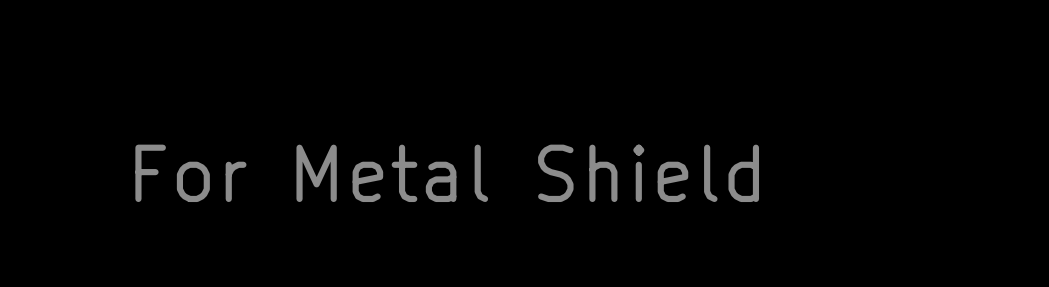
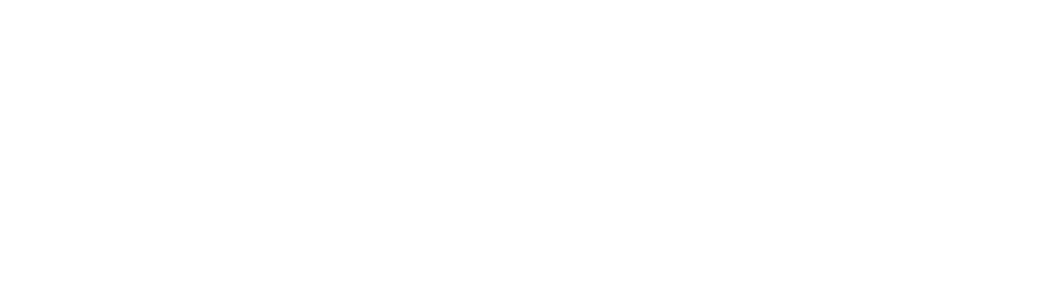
text: For Metal Shield (447, 173) -> none

